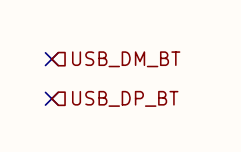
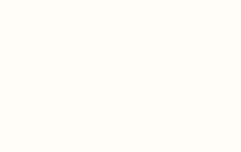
no-connect mark: (51, 59) -> none
hierarchical label: USB_DM_BT (126, 59) -> none
no-connect mark: (51, 98) -> none
hierarchical label: USB_DP_BT (125, 98) -> none

